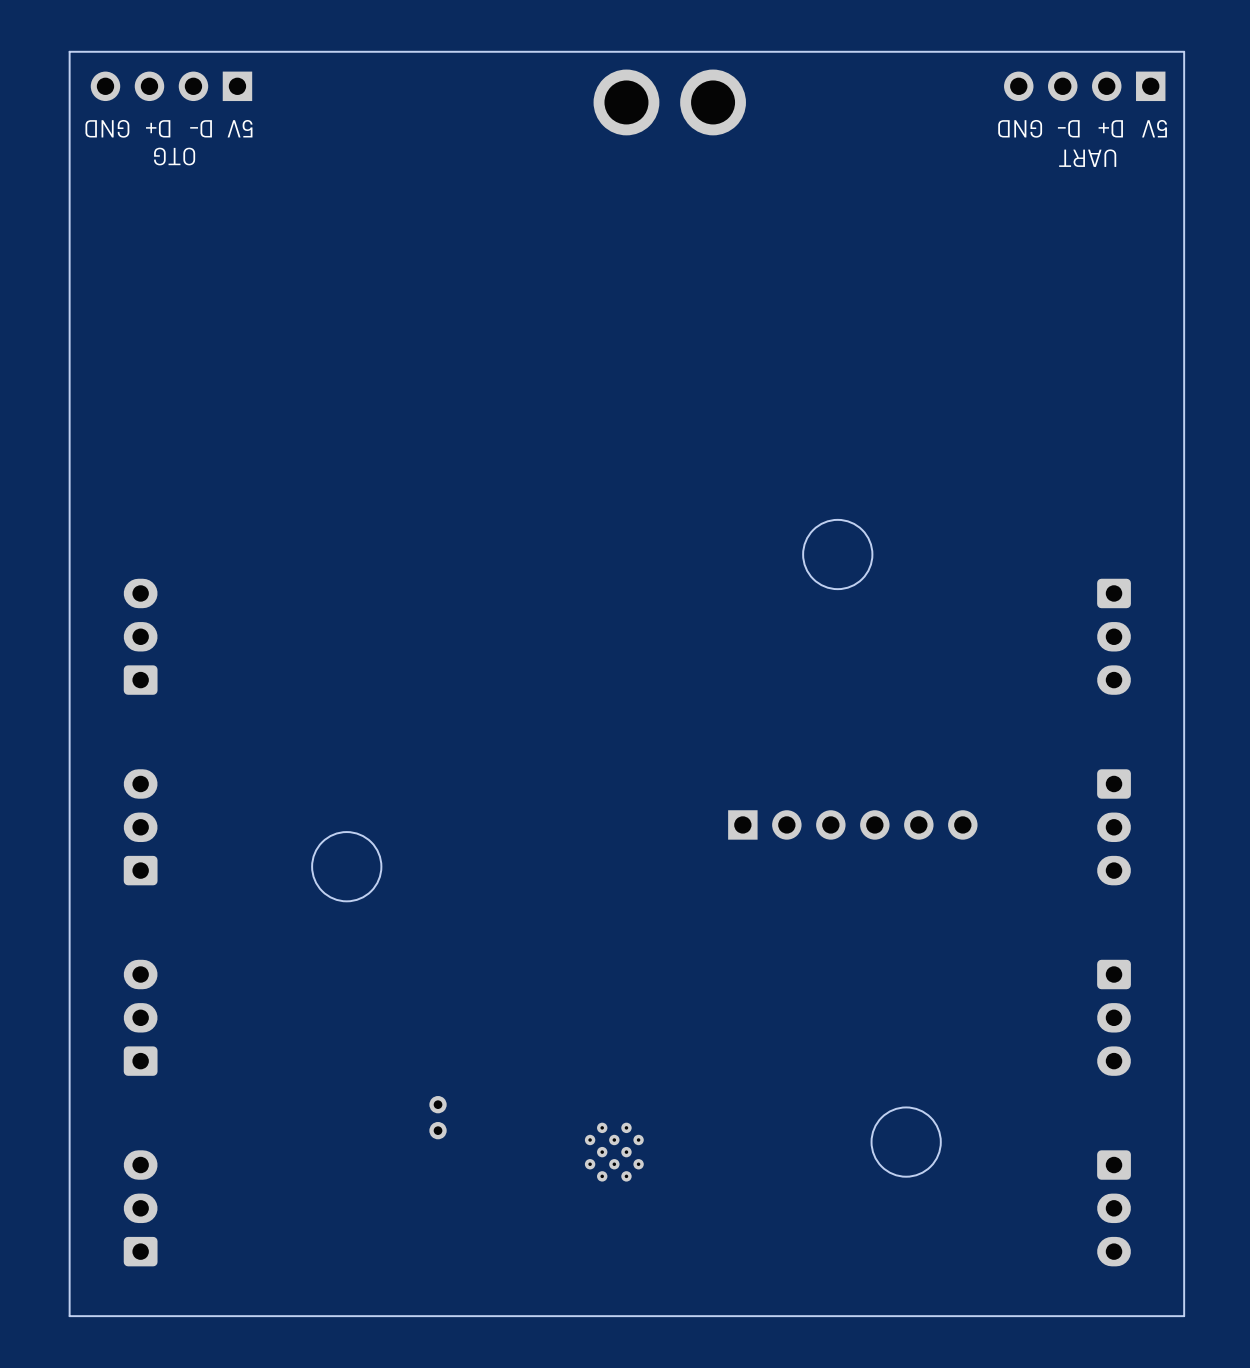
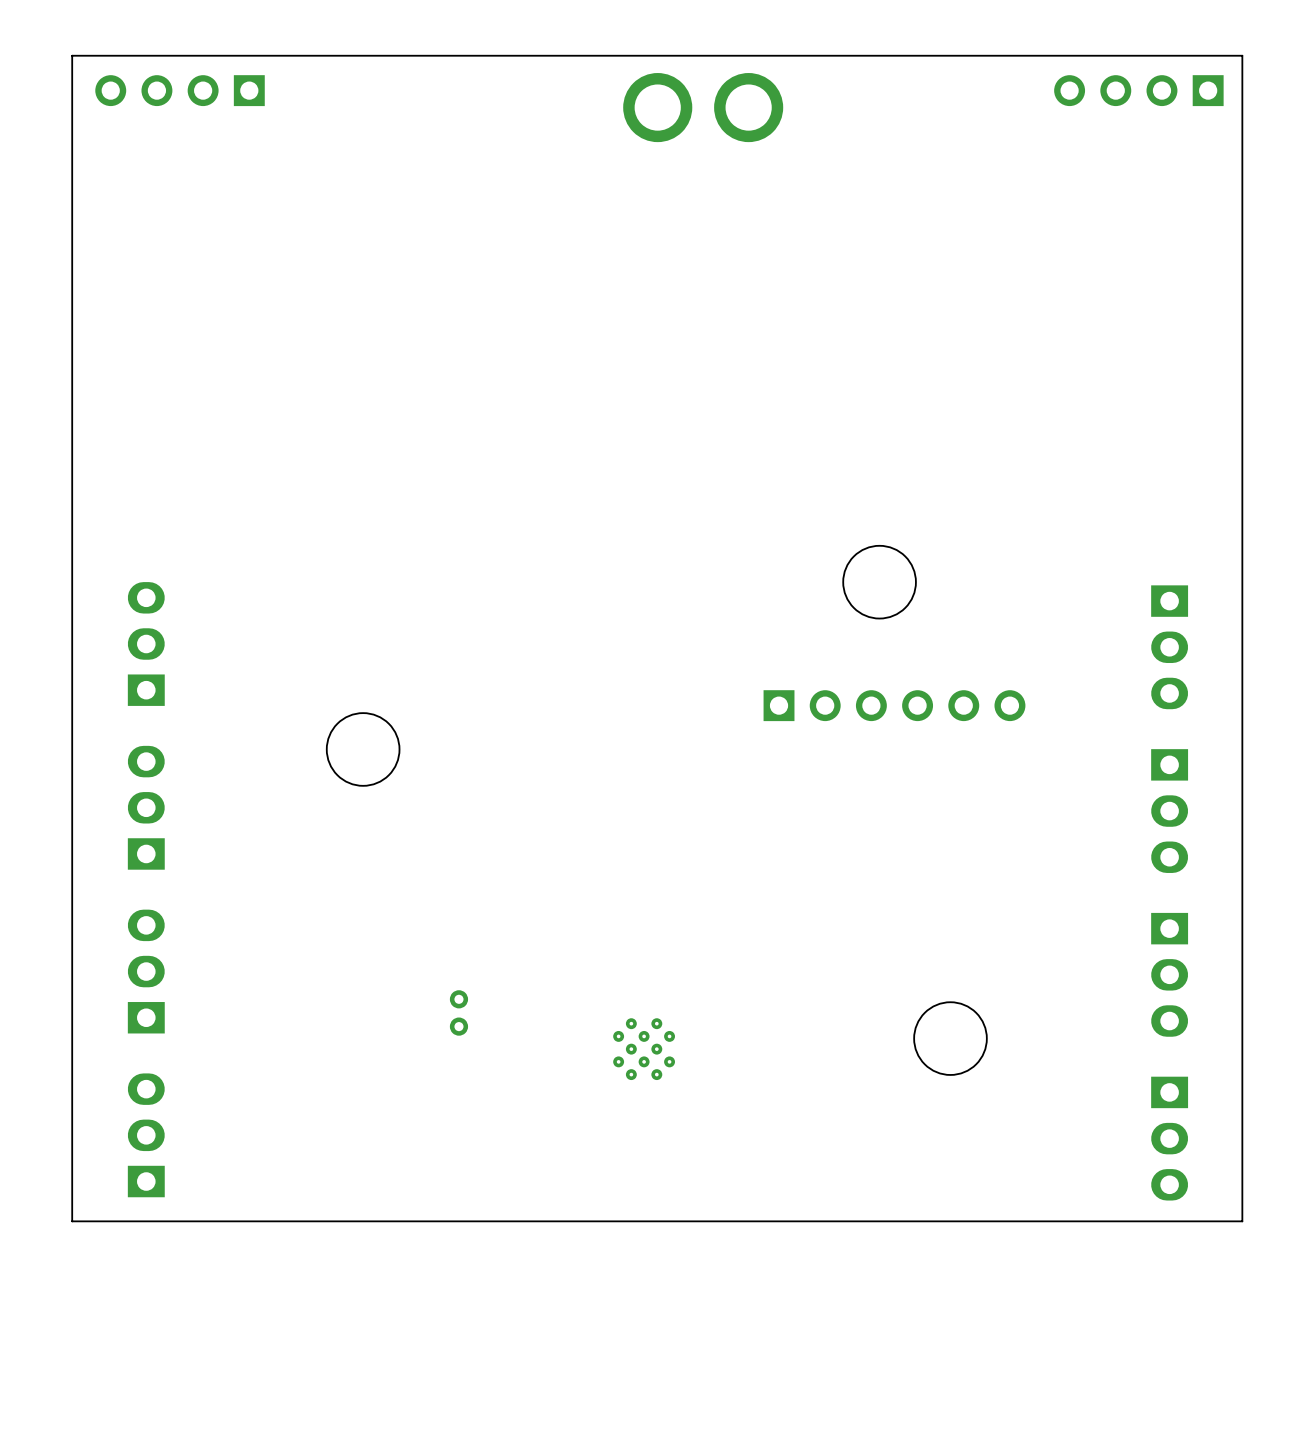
board edge: (1184, 51) (69, 51) (69, 1316) (1184, 1316) (1184, 51) -> (1242, 55) (1242, 1221) (72, 1221) (72, 55) (1242, 55)
text: GND (107, 128) -> none
text: D+ (158, 128) -> none
text: D- (201, 128) -> none
text: 5V (240, 128) -> none
text: GND (1020, 128) -> none
text: D- (1068, 128) -> none
text: D+ (1110, 128) -> none
text: 5V (1154, 128) -> none
text: OTG (174, 156) -> none
text: UART (1087, 158) -> none
part: none -> (146, 644)
part: none -> (1169, 647)
part: (140, 636) -> none
part: (1114, 636) -> none
part: none -> (146, 807)
part: none -> (1169, 811)
part position: (852, 824) -> (894, 705)
part: (140, 827) -> none
part: (1114, 827) -> none
round board edge position: (346, 866) -> (363, 749)
part: none -> (146, 971)
part: none -> (1169, 974)
part: (140, 1017) -> none
part: (1114, 1017) -> none
part: none -> (146, 1135)
part: none -> (1169, 1138)
part position: (438, 1117) -> (458, 1012)
round board edge position: (906, 1142) -> (950, 1038)
part position: (614, 1152) -> (644, 1049)
part: (140, 1208) -> none
part: (1114, 1208) -> none

